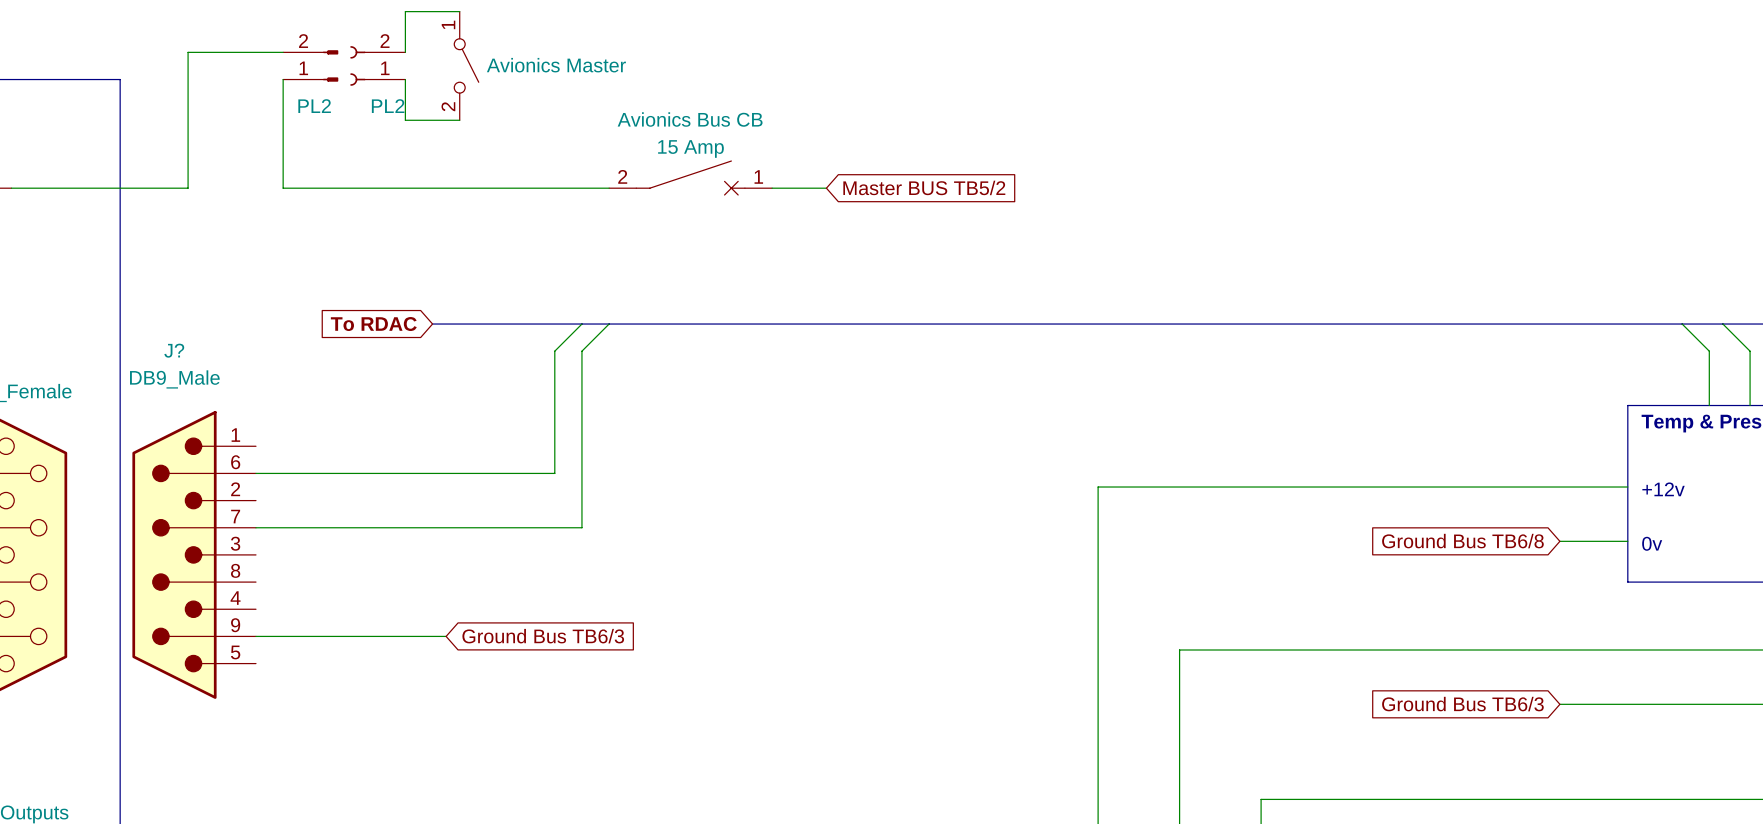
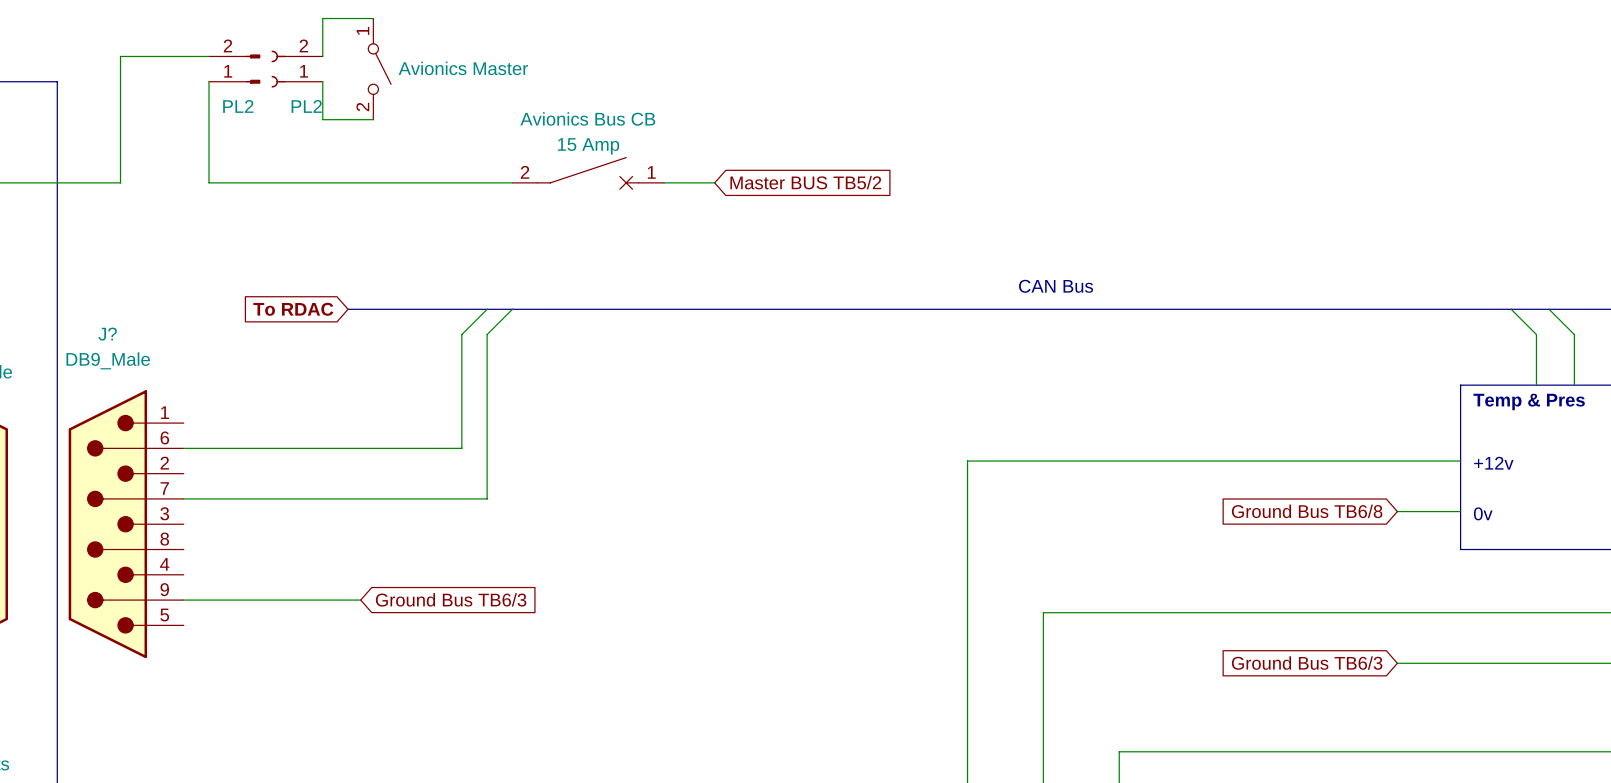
text: none -> CAN Bus (1056, 286)

